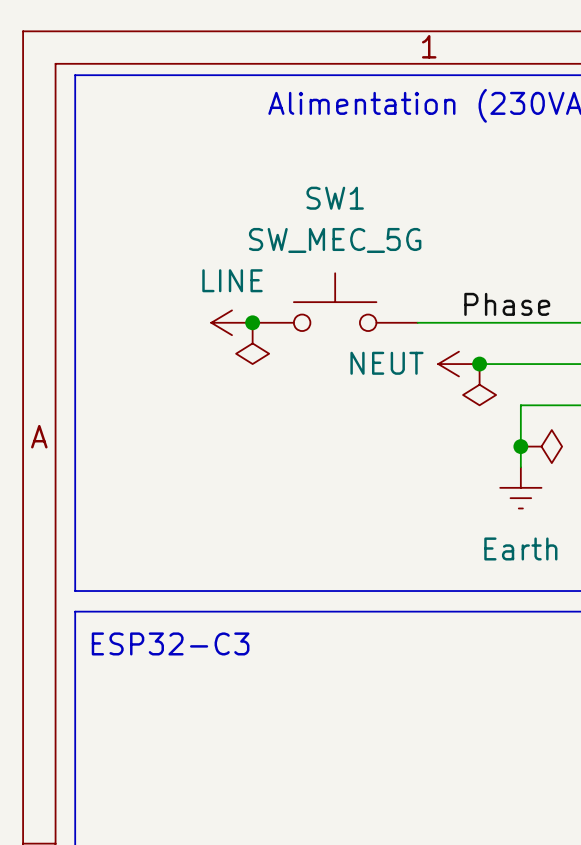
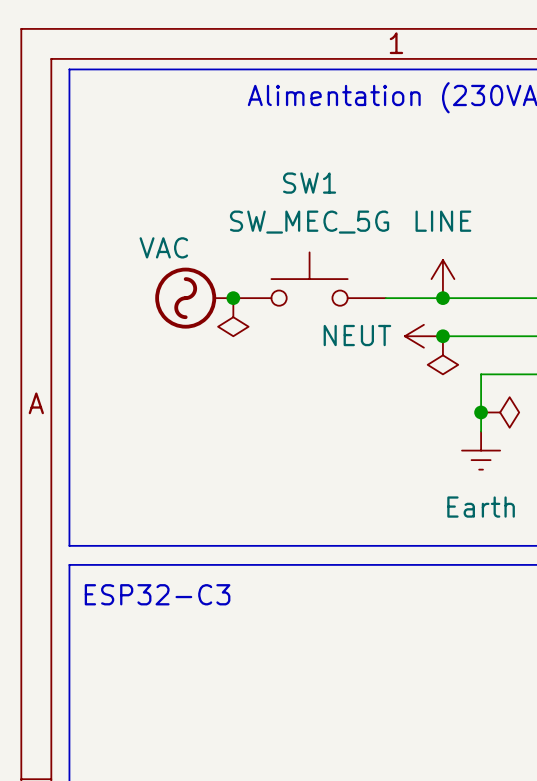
label: Phase (507, 304) -> none
power symbol: none -> VAC (194, 298)
power symbol rotation: 0° (232, 322) -> 90° clockwise (442, 279)
power symbol position: LINE (232, 322) -> LINE (442, 279)
junction: none -> (442, 298)

